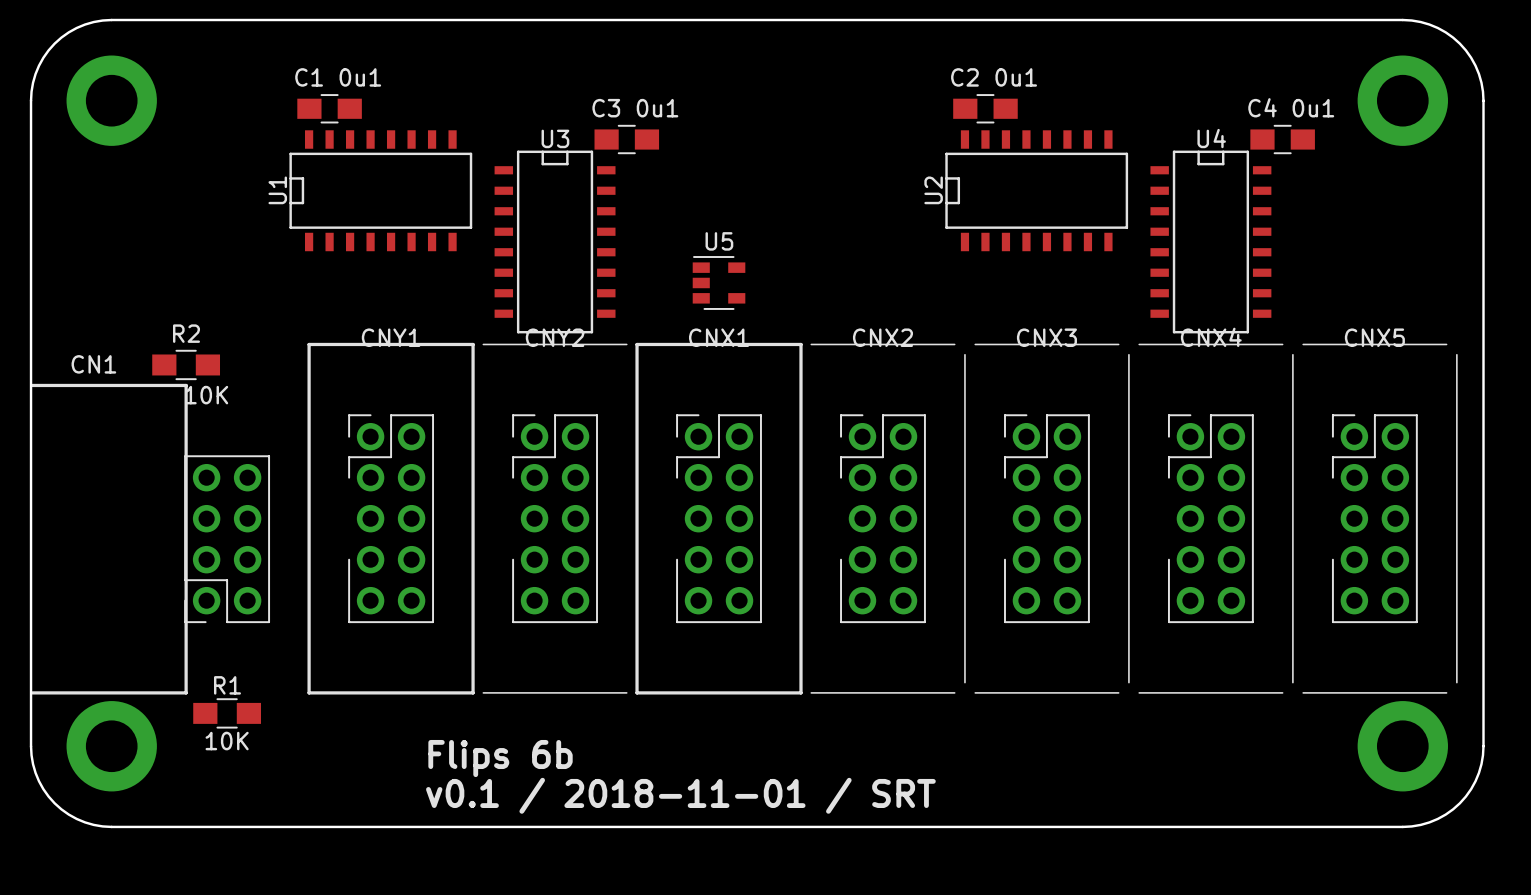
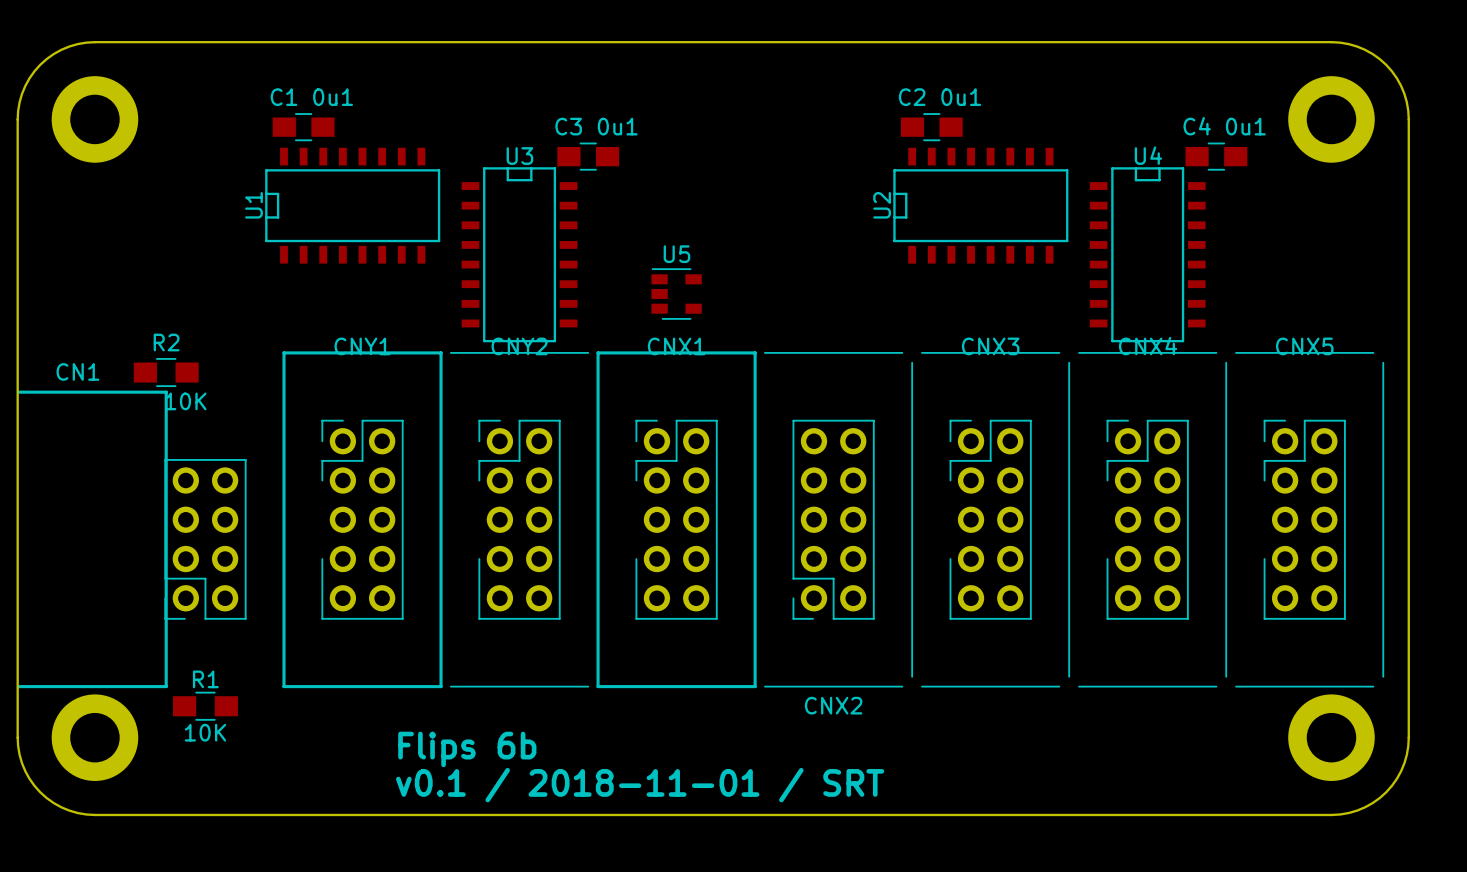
CNX2 name position: CNX2 (882, 337) -> CNX2 (833, 705)
CNX2 footprint: [840, 414, 926, 624] -> [792, 419, 875, 620]

